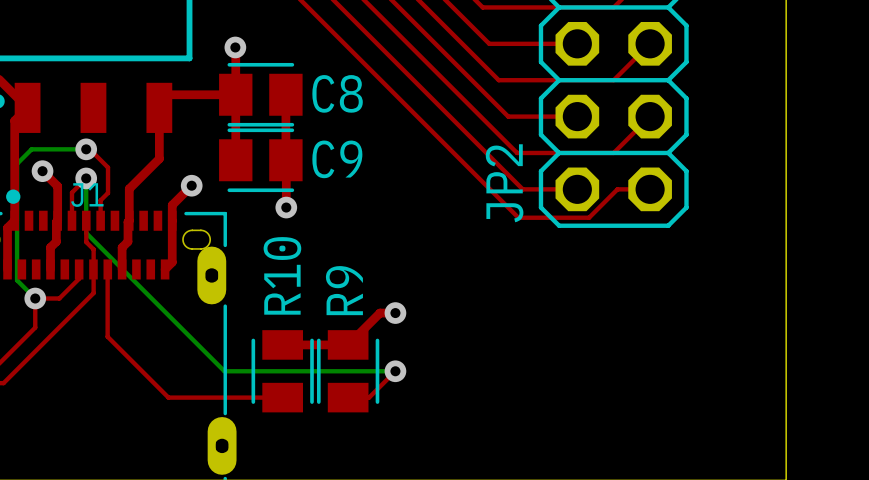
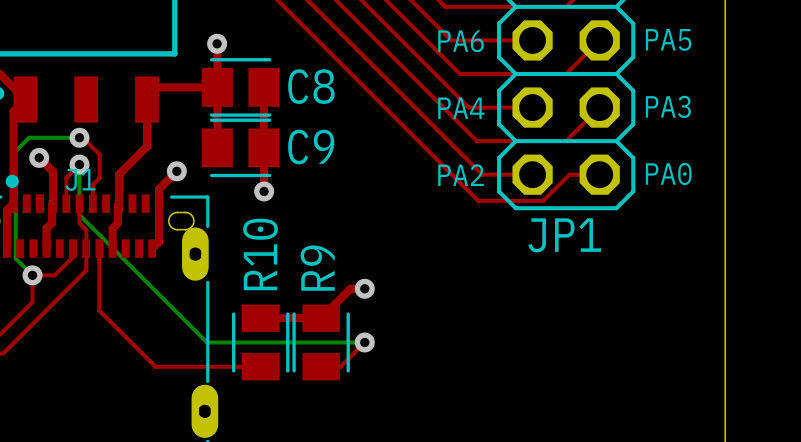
text: none -> PA5 (668, 39)
text: none -> PA6 (461, 41)
text: none -> PA3 (668, 106)
text: none -> PA4 (461, 108)
JP2 name: JP2 (504, 183) -> JP1 (564, 235)
text: none -> PA0 (668, 174)
text: none -> PA2 (461, 175)

